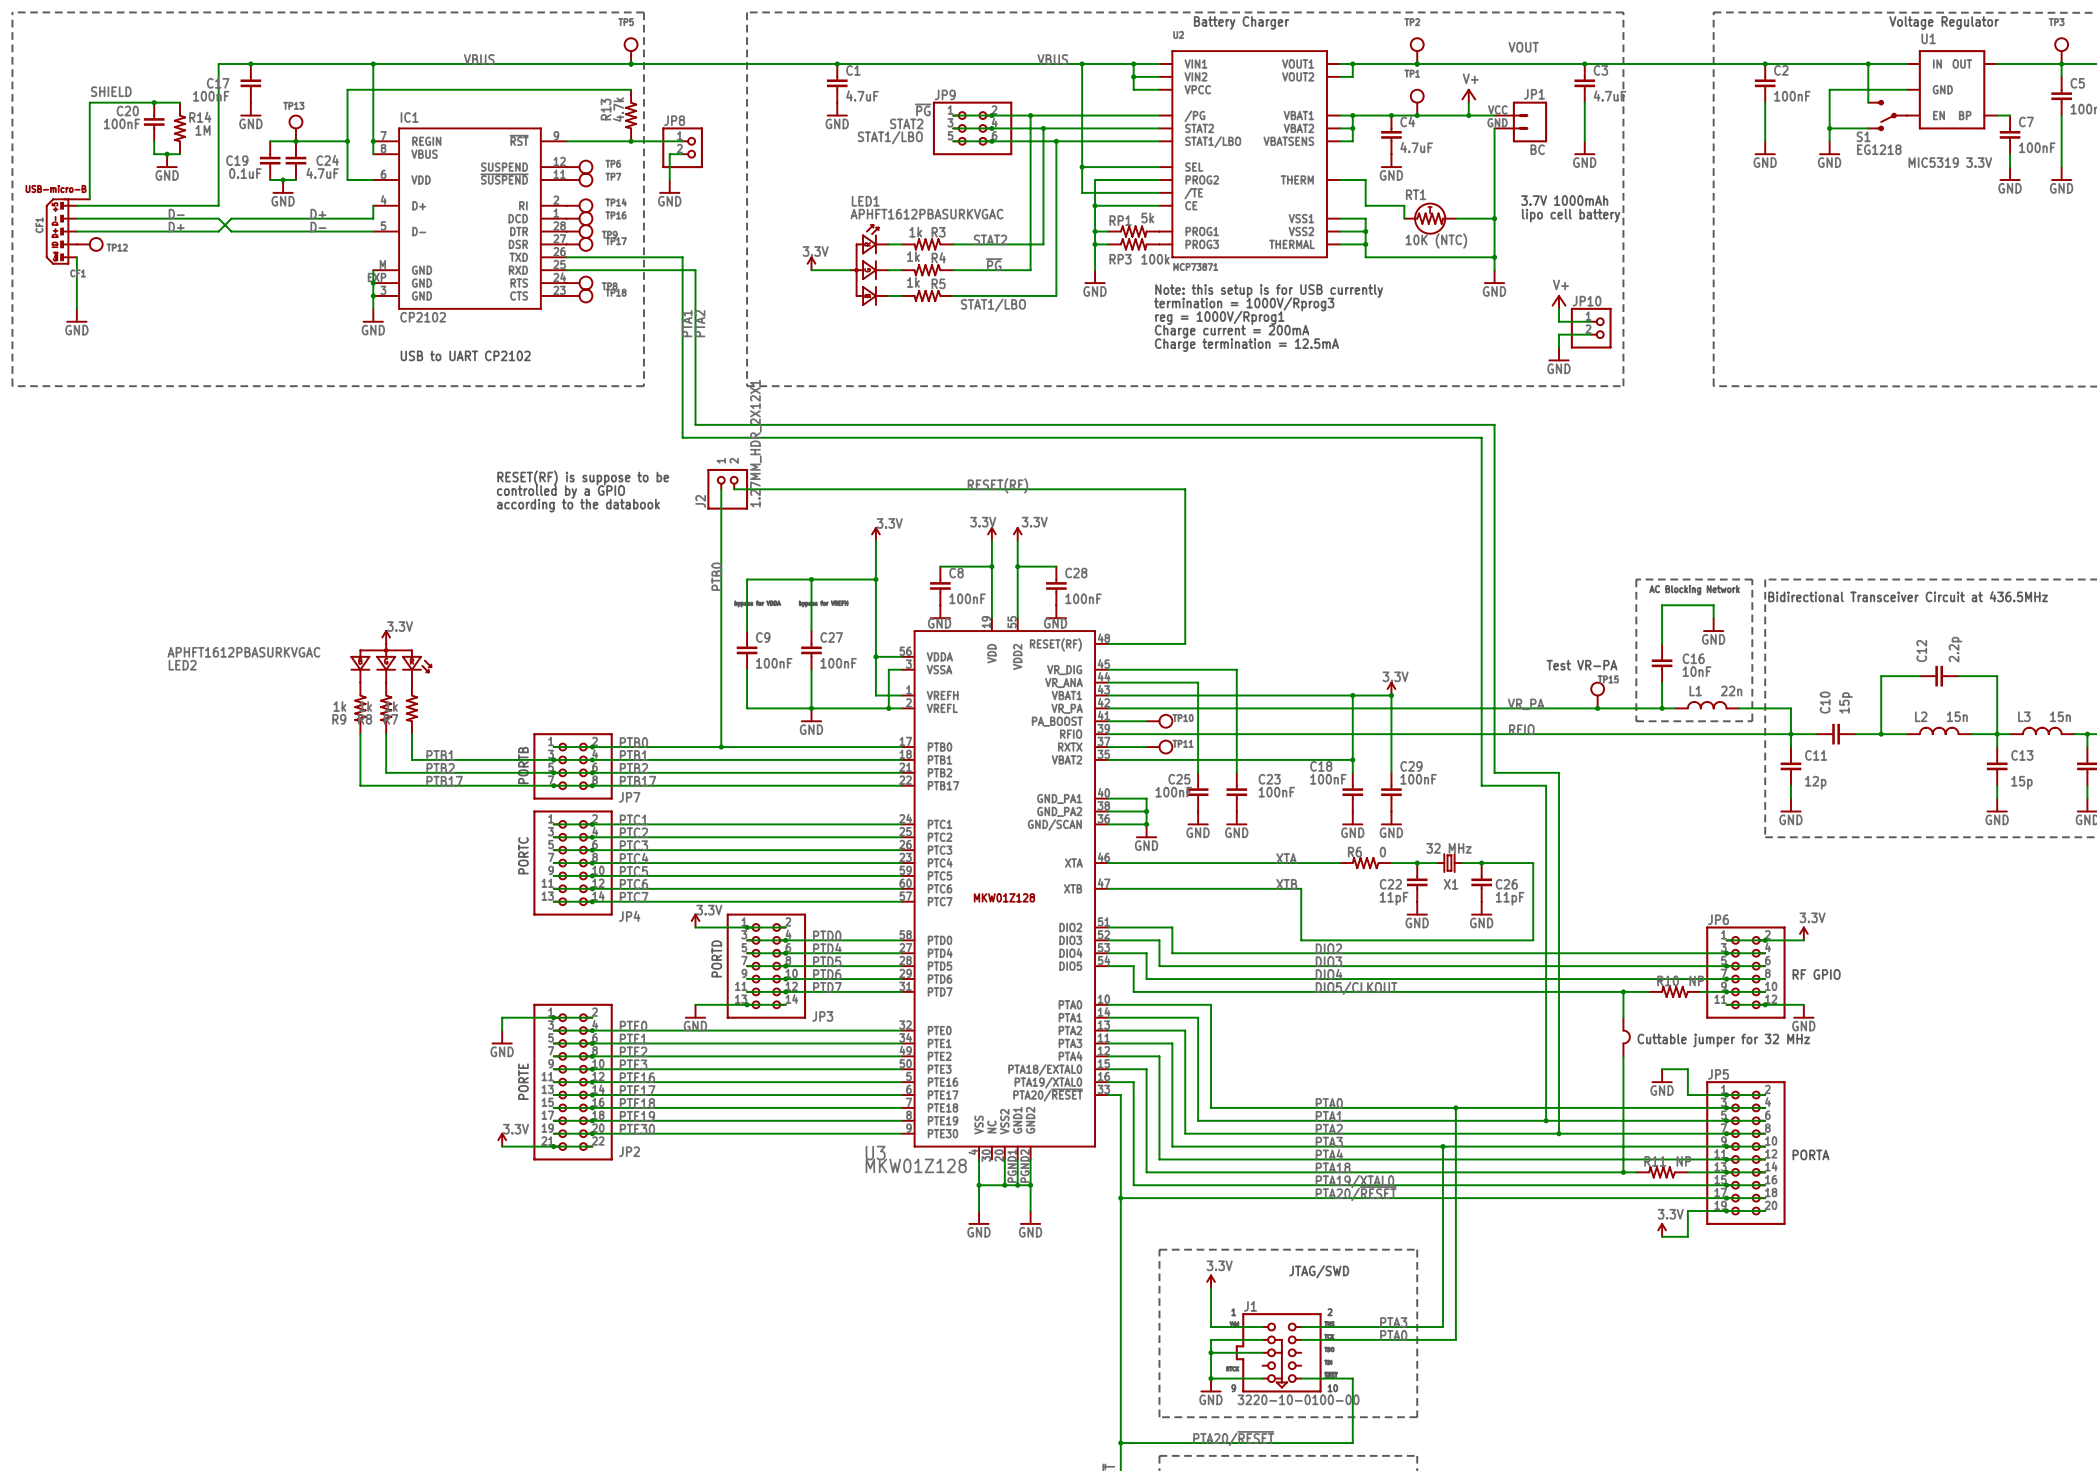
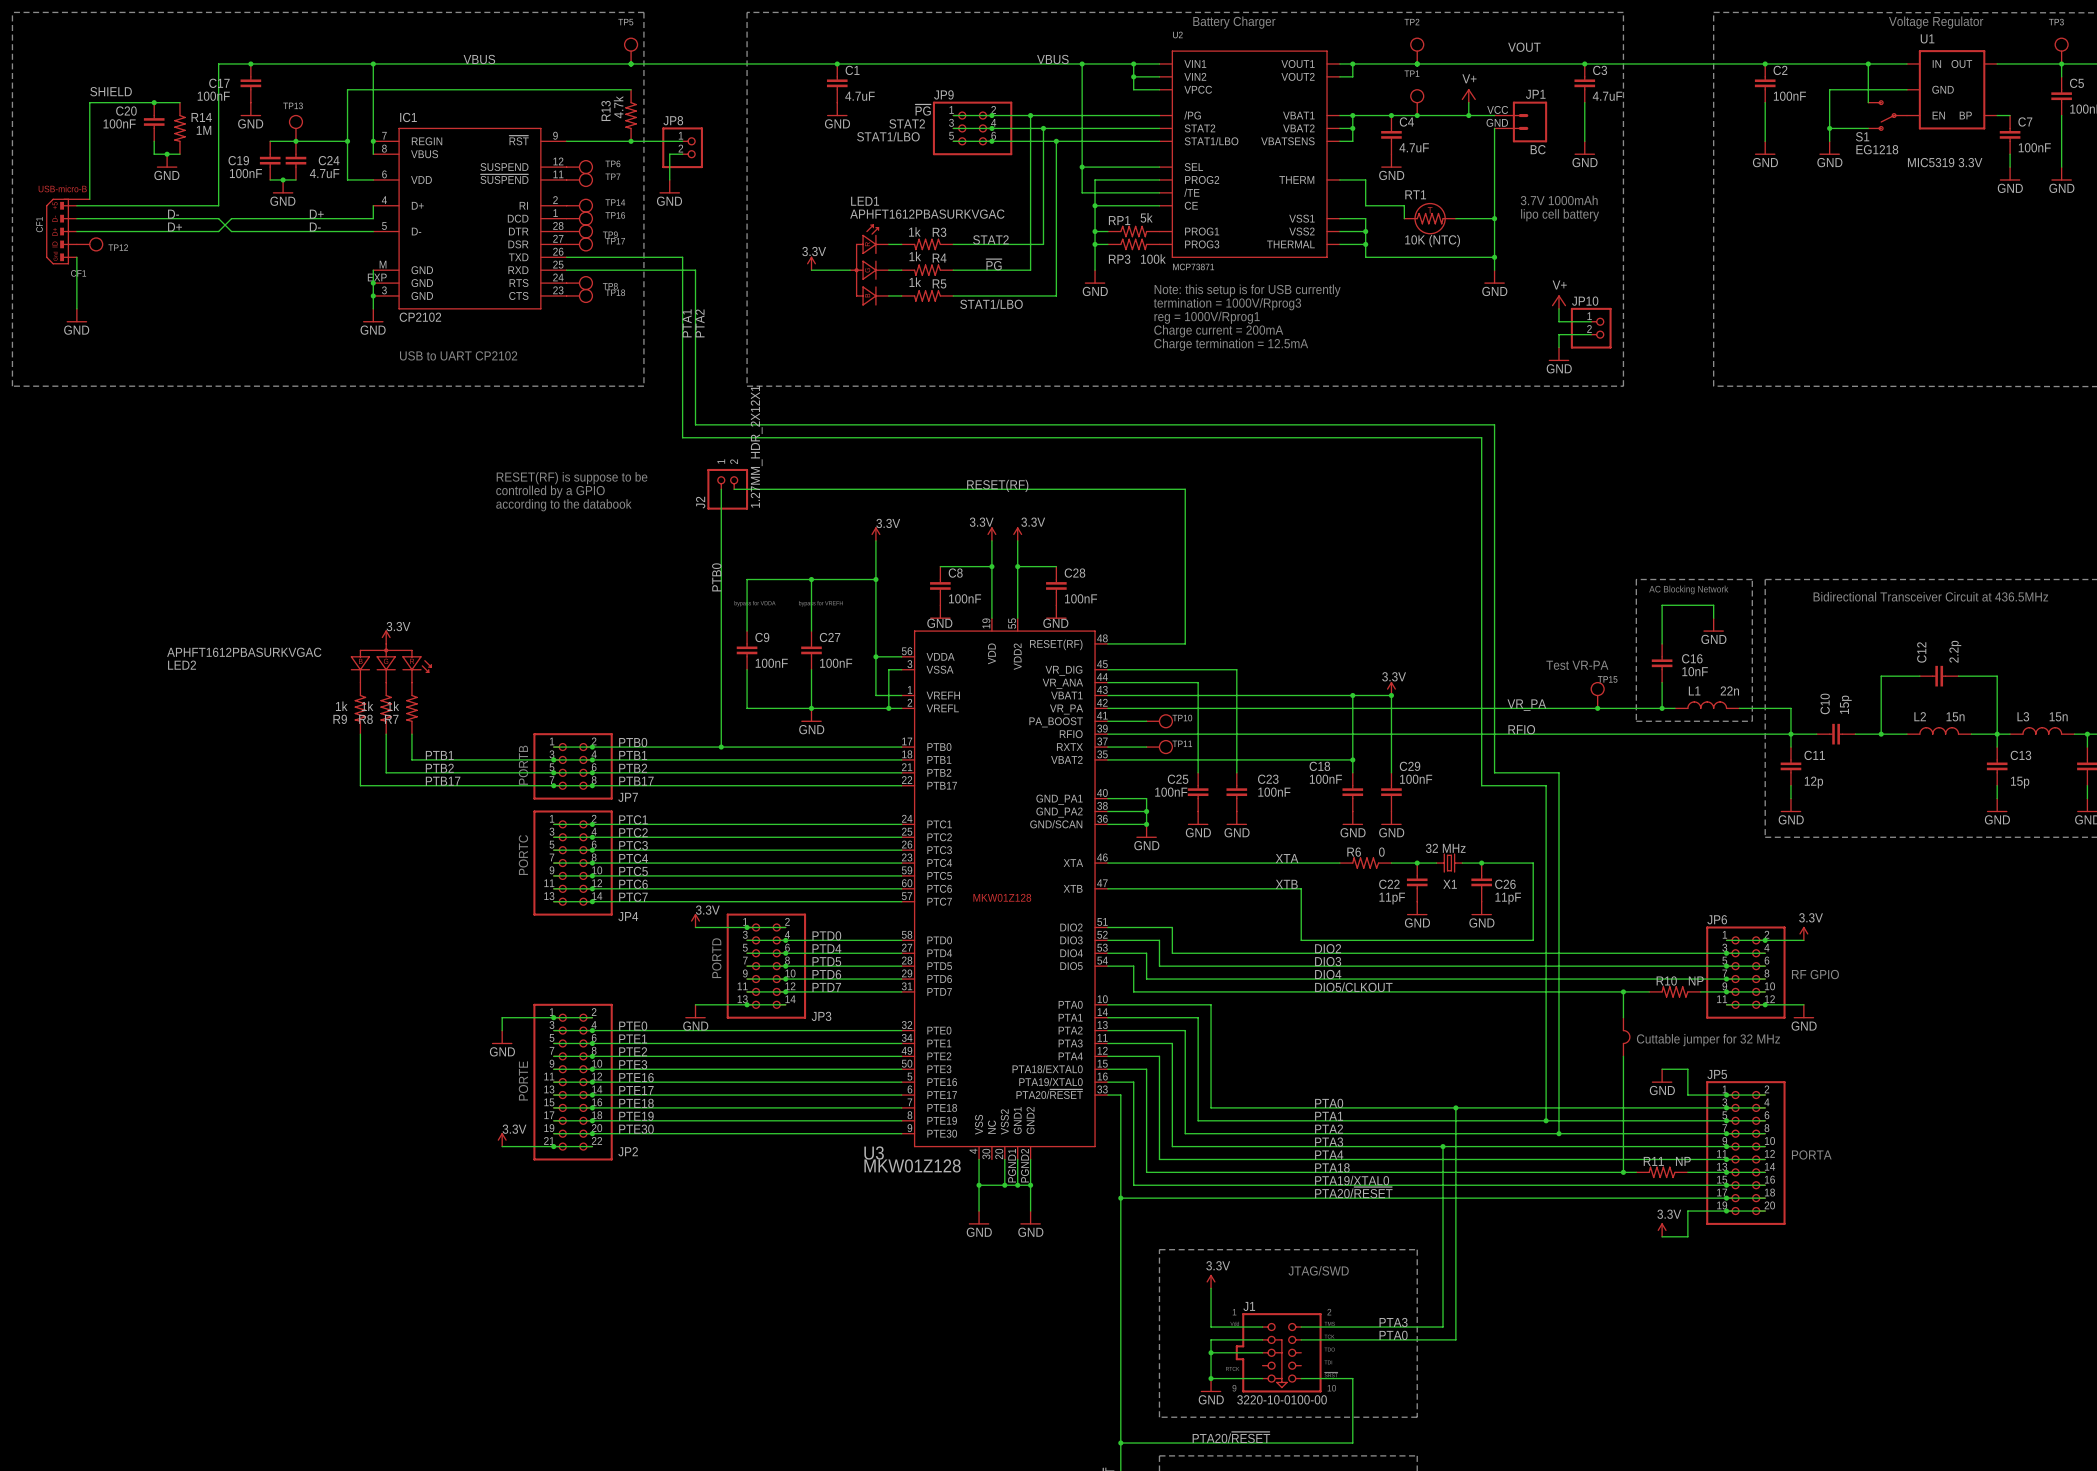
C19 value: 0.1uF (245, 173) -> 100nF (245, 173)

